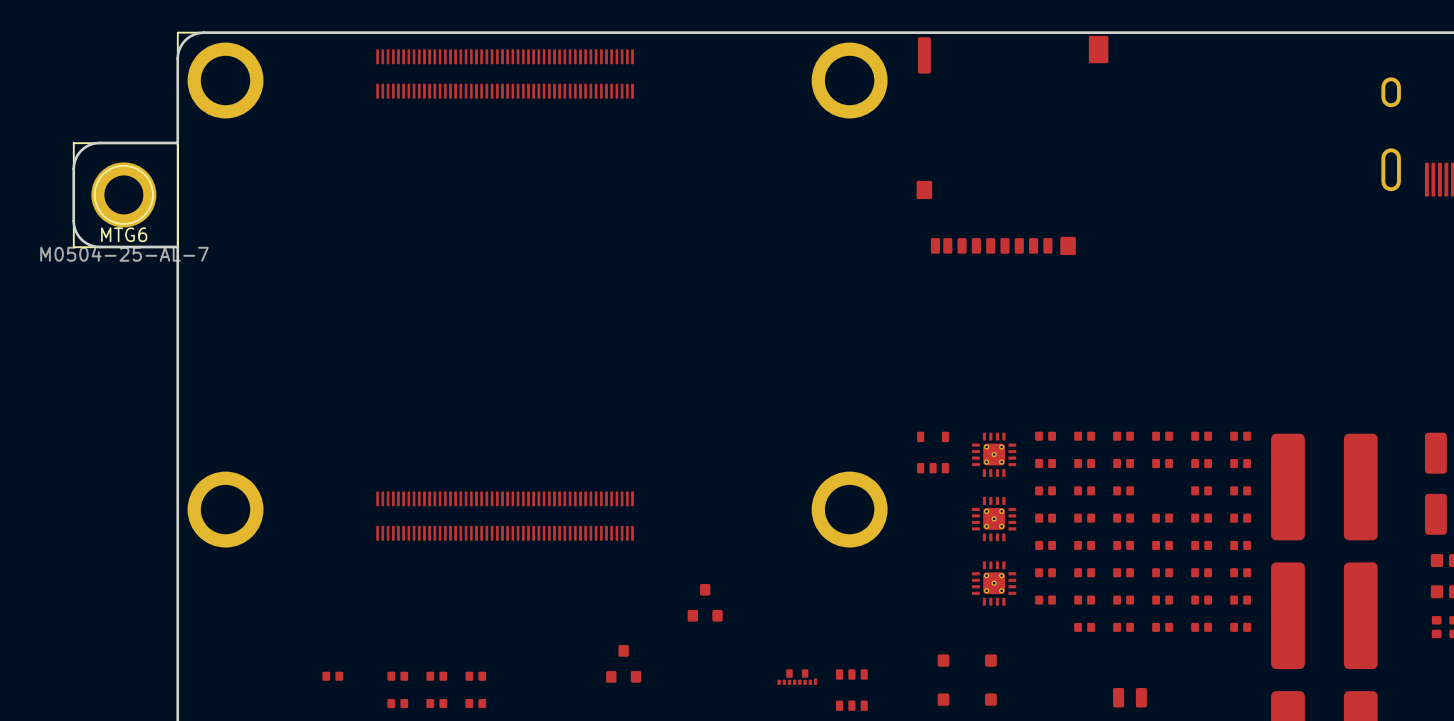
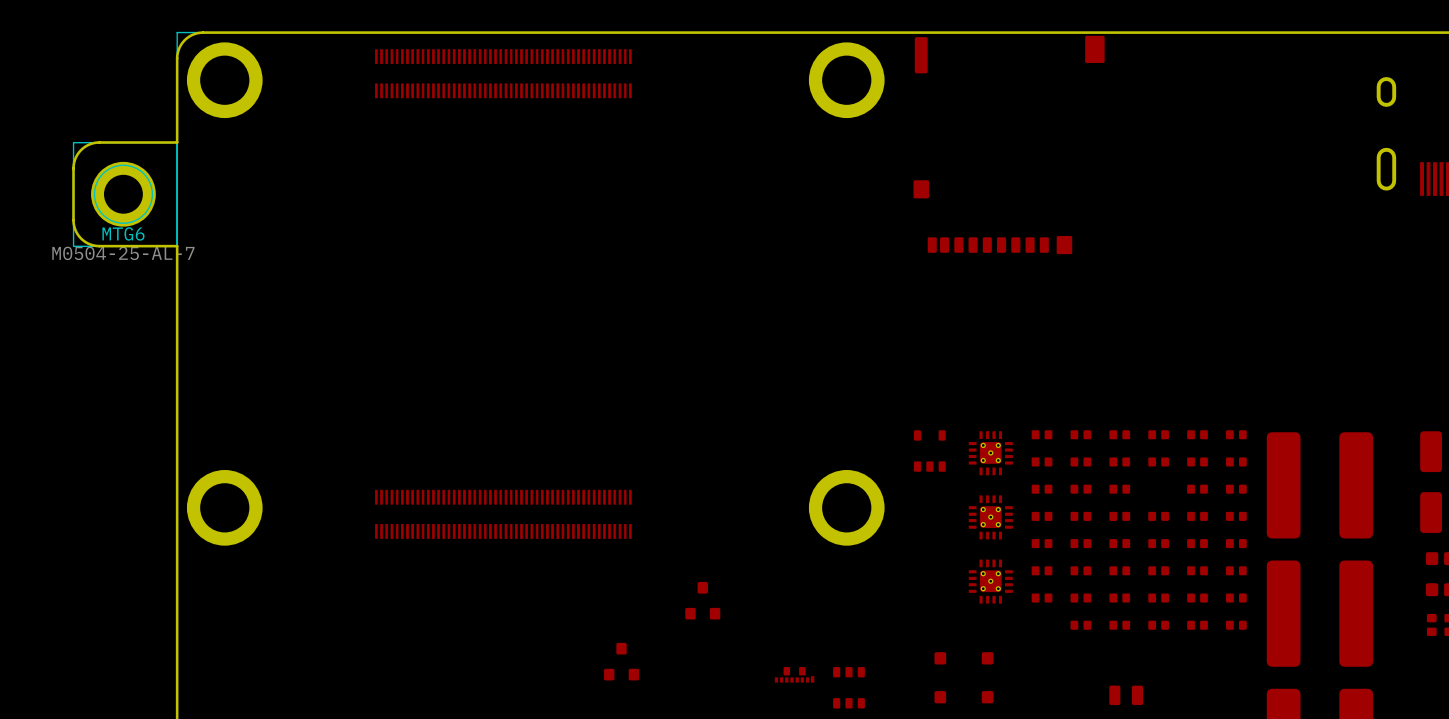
part: (332, 676) -> none
part: (397, 676) -> none
part: (436, 676) -> none
part: (475, 676) -> none
part: (397, 703) -> none
part: (436, 703) -> none
part: (475, 703) -> none

